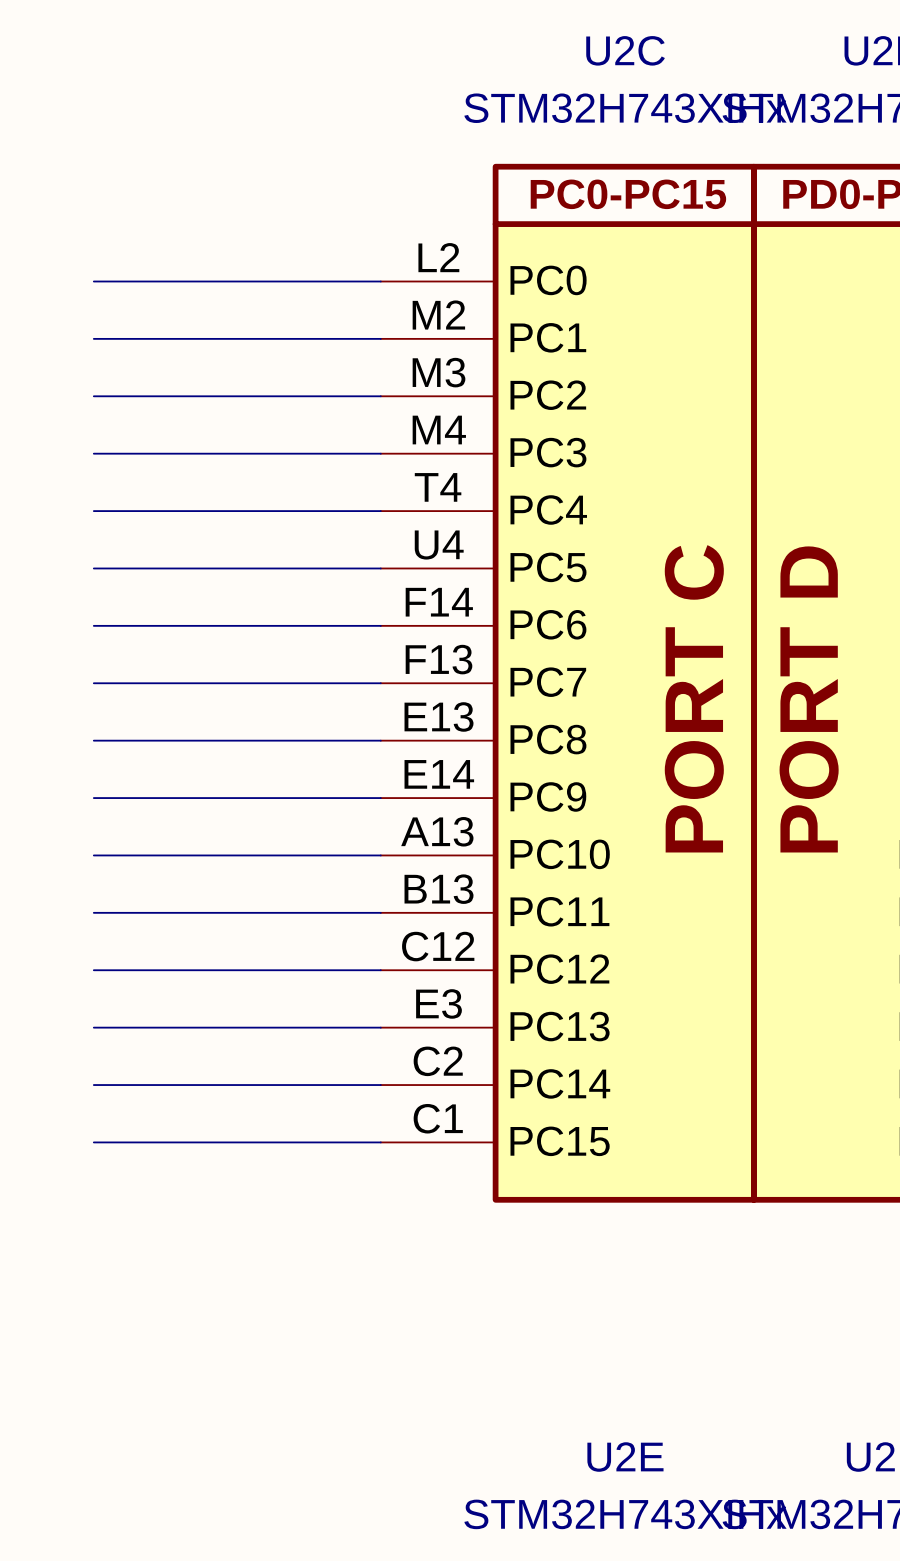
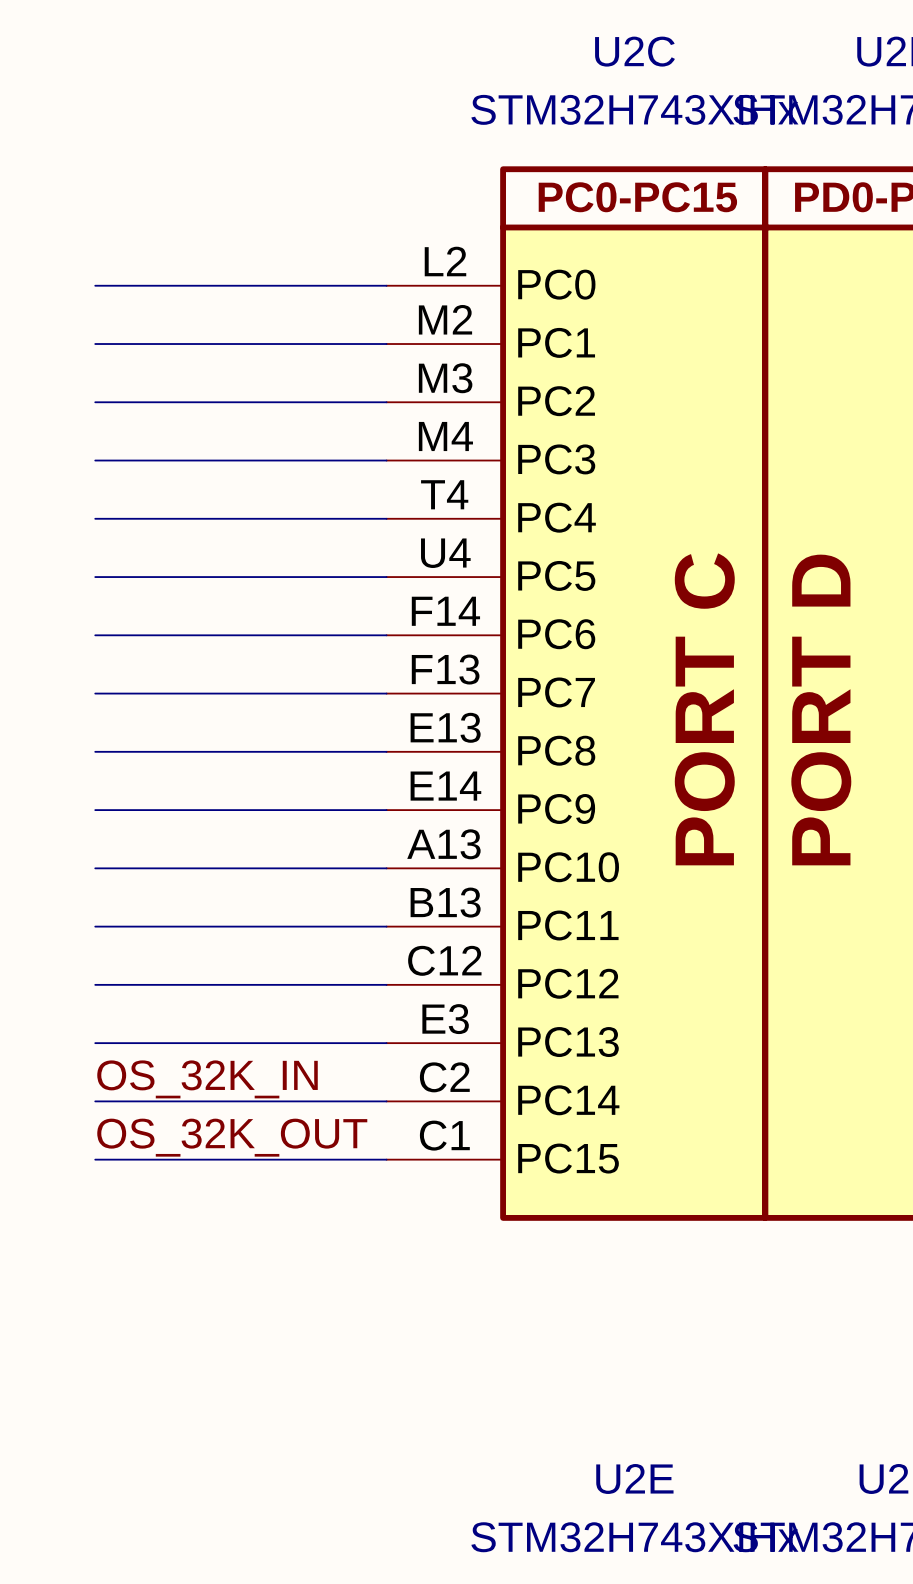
label: none -> OS_32K_IN (207, 1079)
label: none -> OS_32K_OUT (232, 1137)

